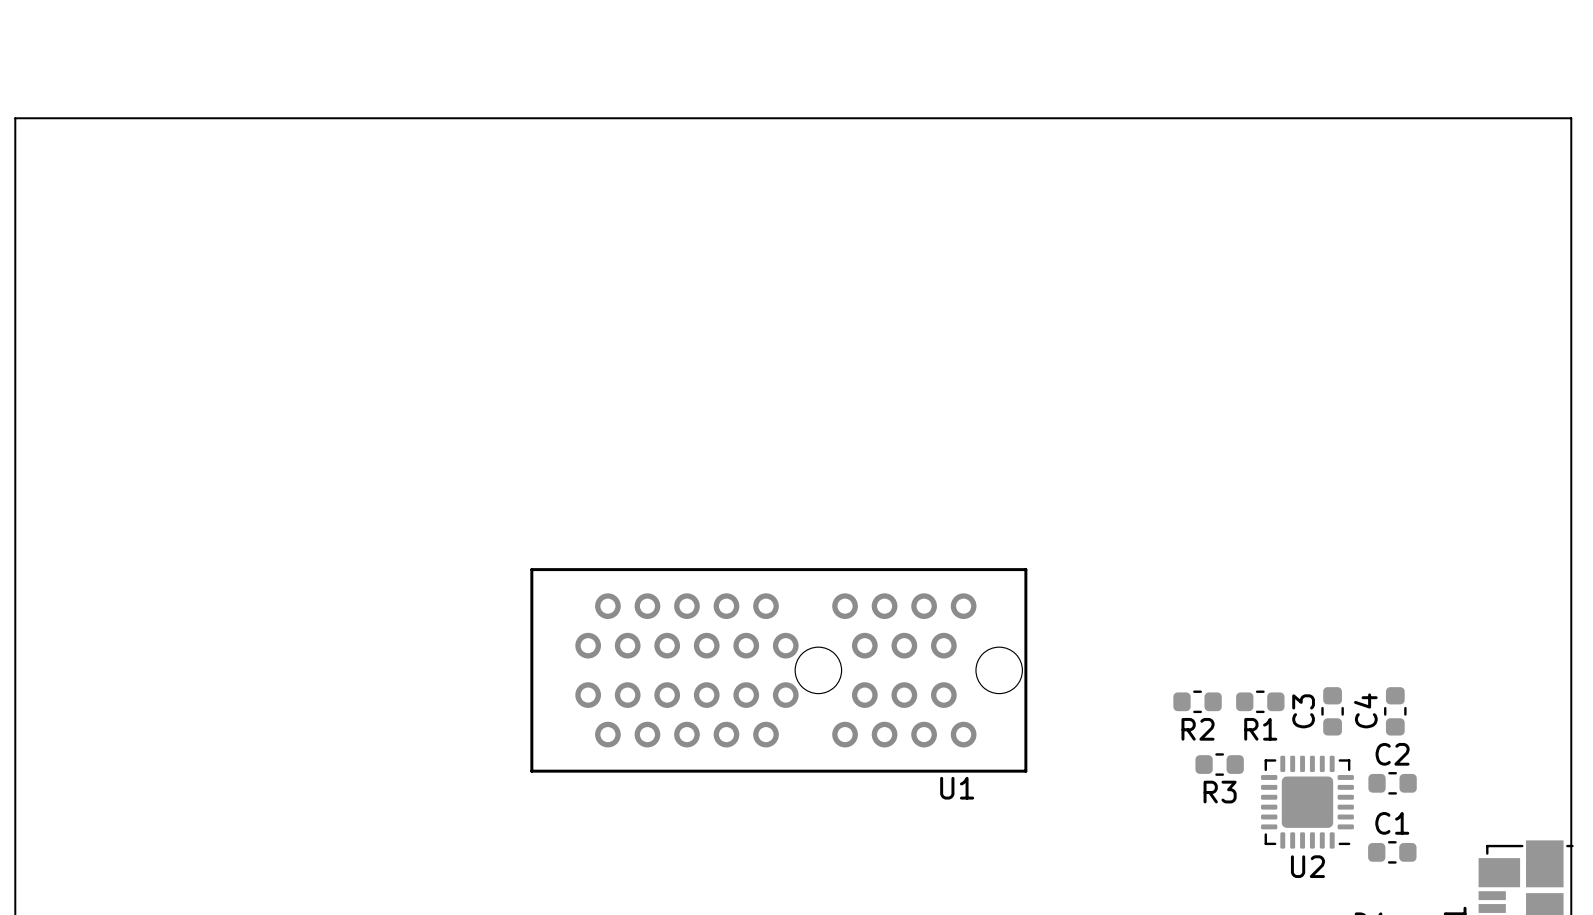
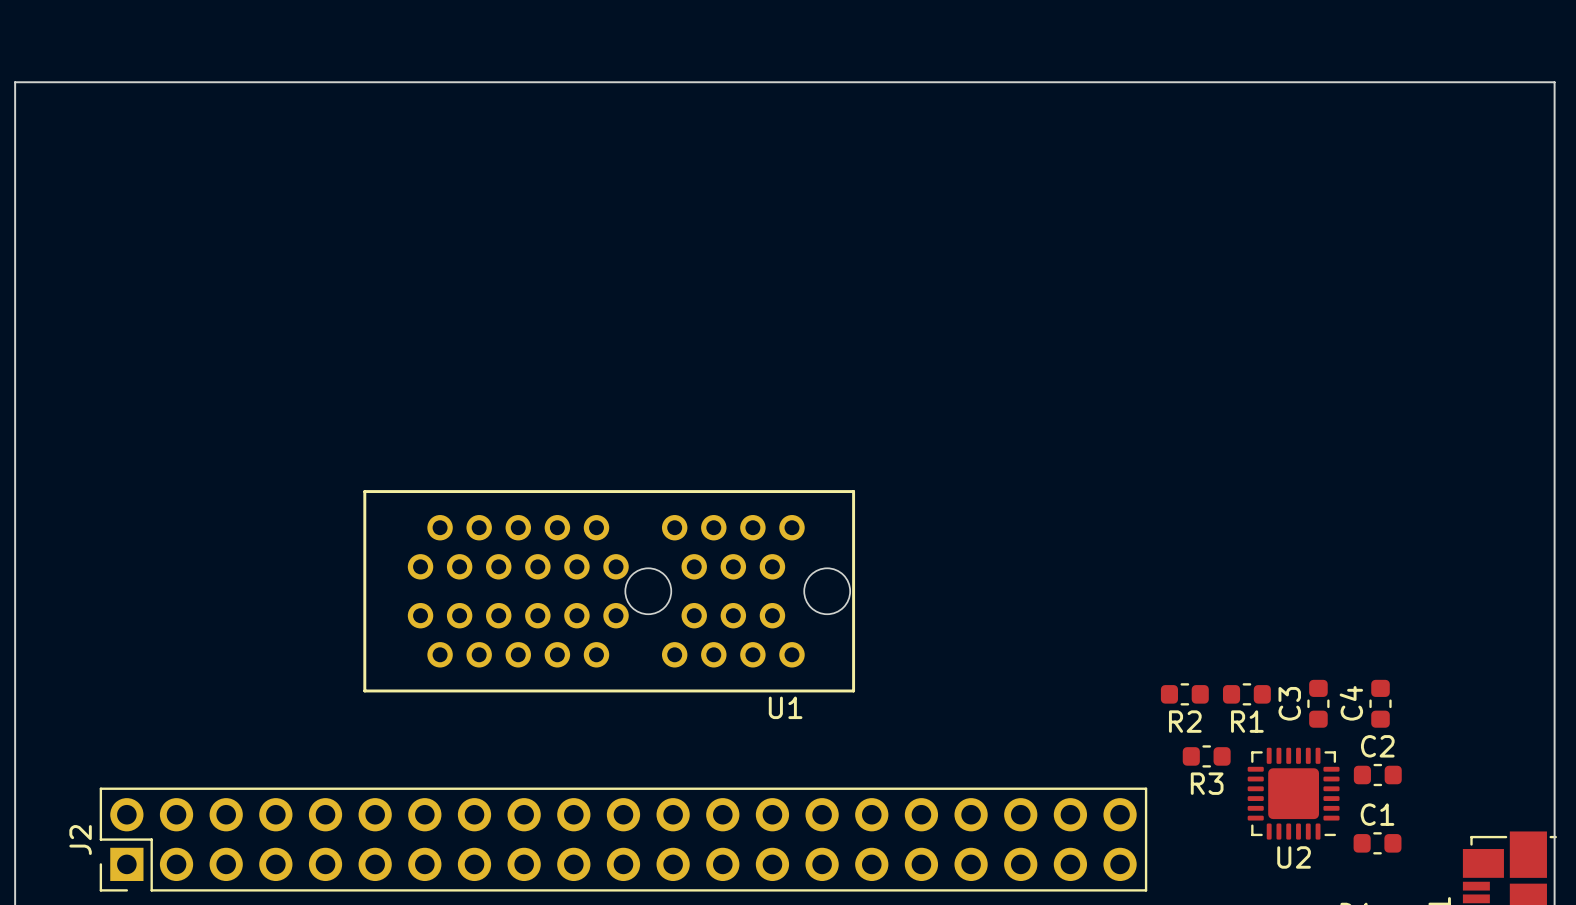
board edge: (15, 118) (1571, 118) -> (15, 117) (15, 82) (1554, 82) (1554, 117)
U1 position: (778, 670) -> (609, 591)
J2: none -> (623, 839)

